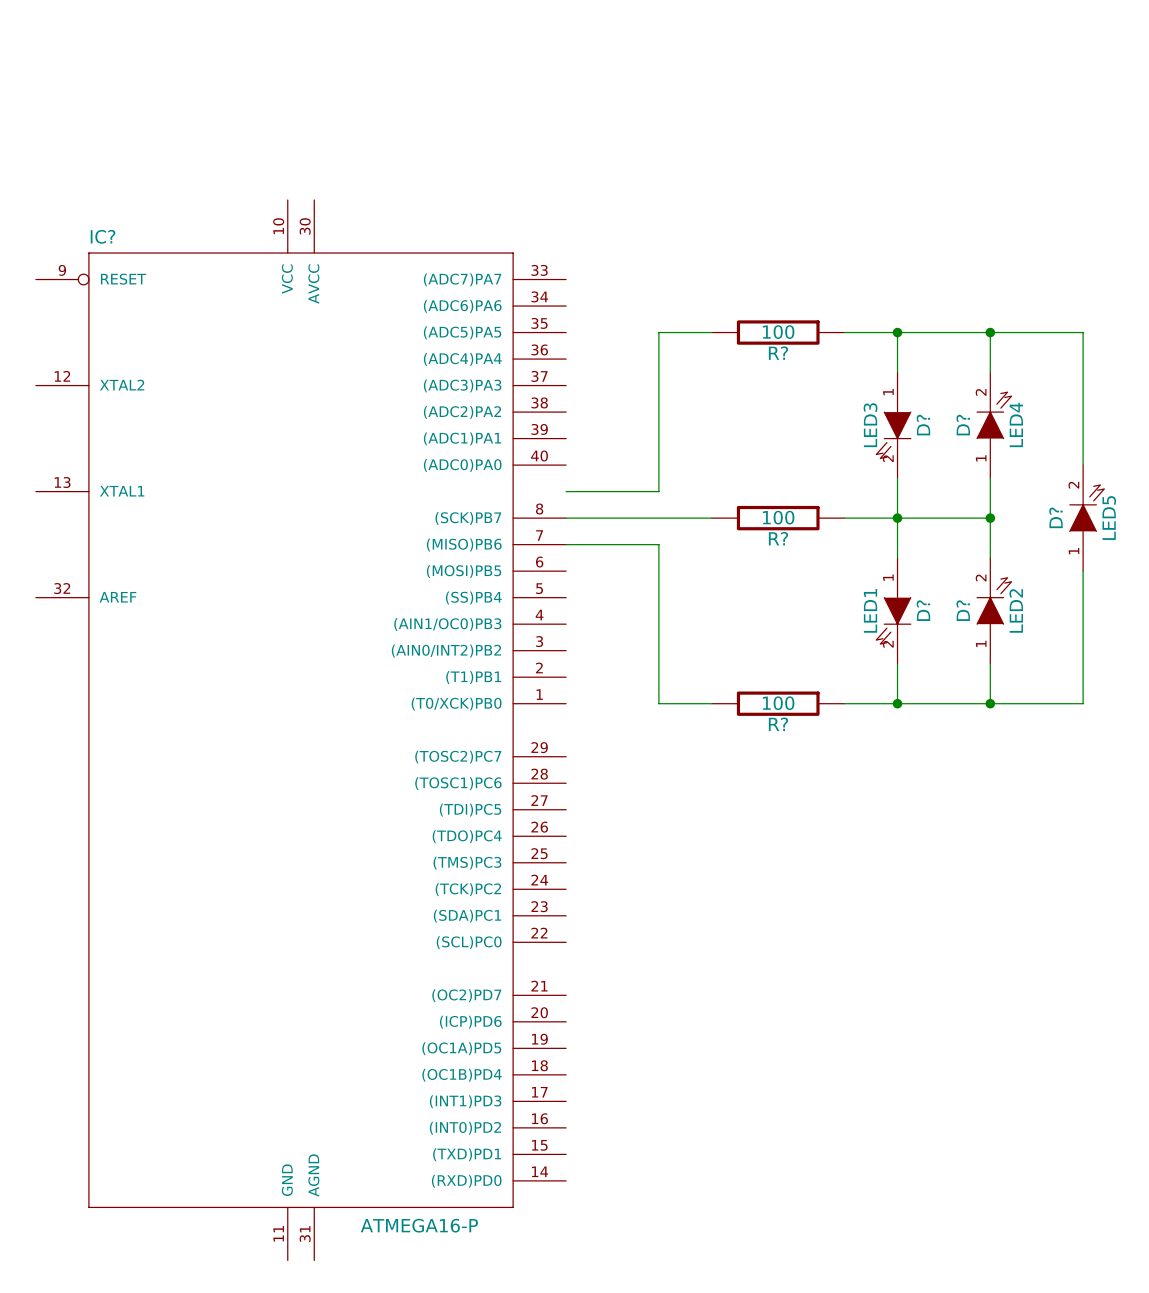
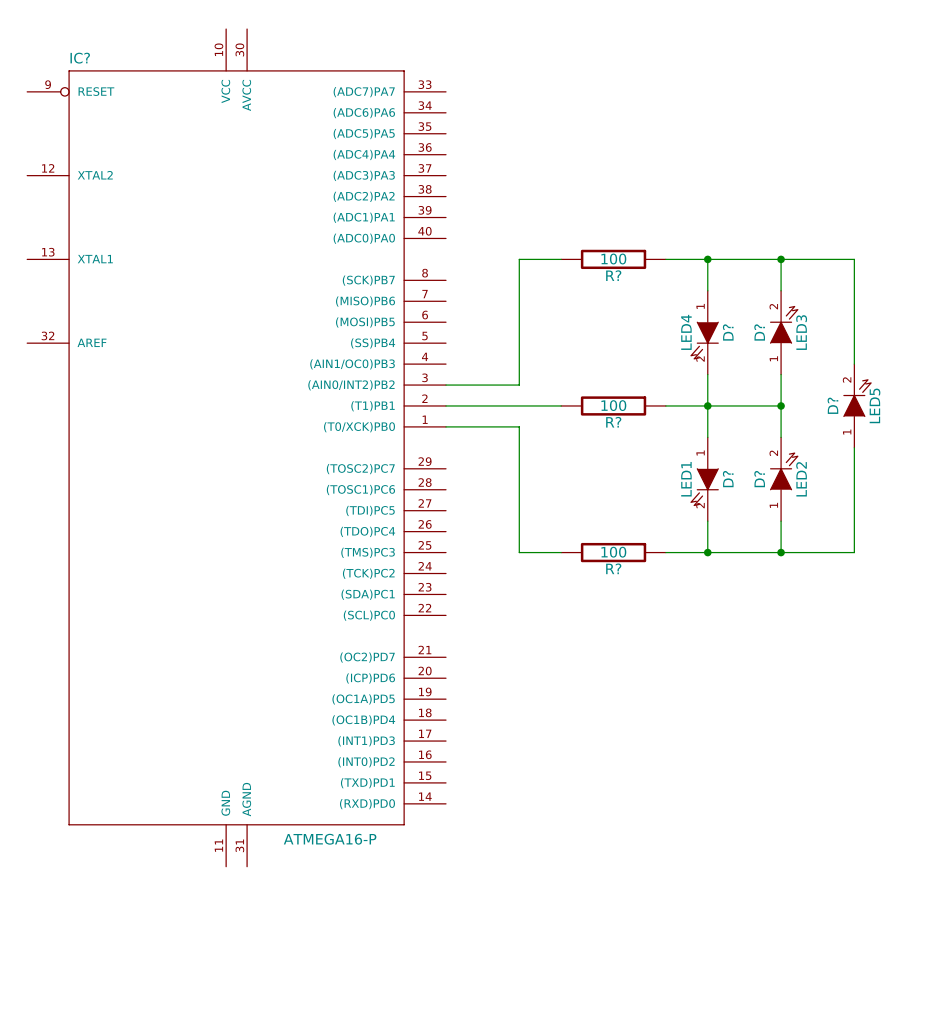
D? value: LED4 (1016, 424) -> LED3 (801, 332)
D? value: LED3 (870, 425) -> LED4 (686, 332)
IC? position: (301, 730) -> (236, 447)

